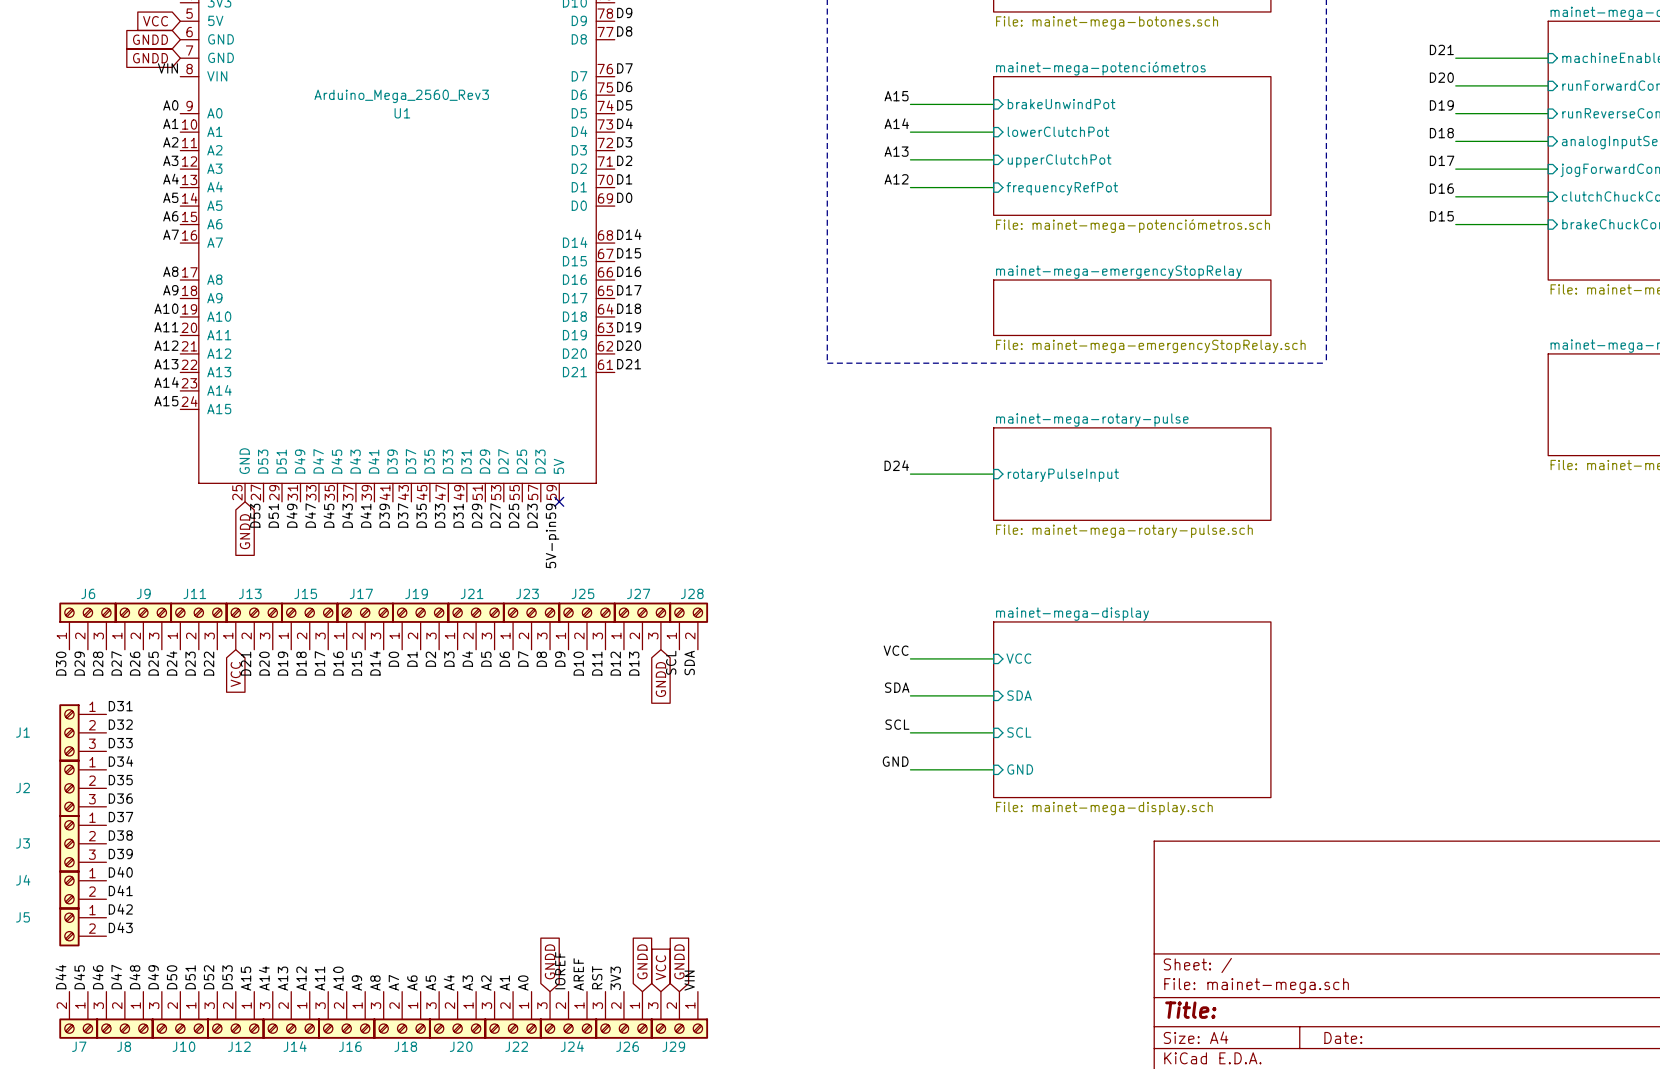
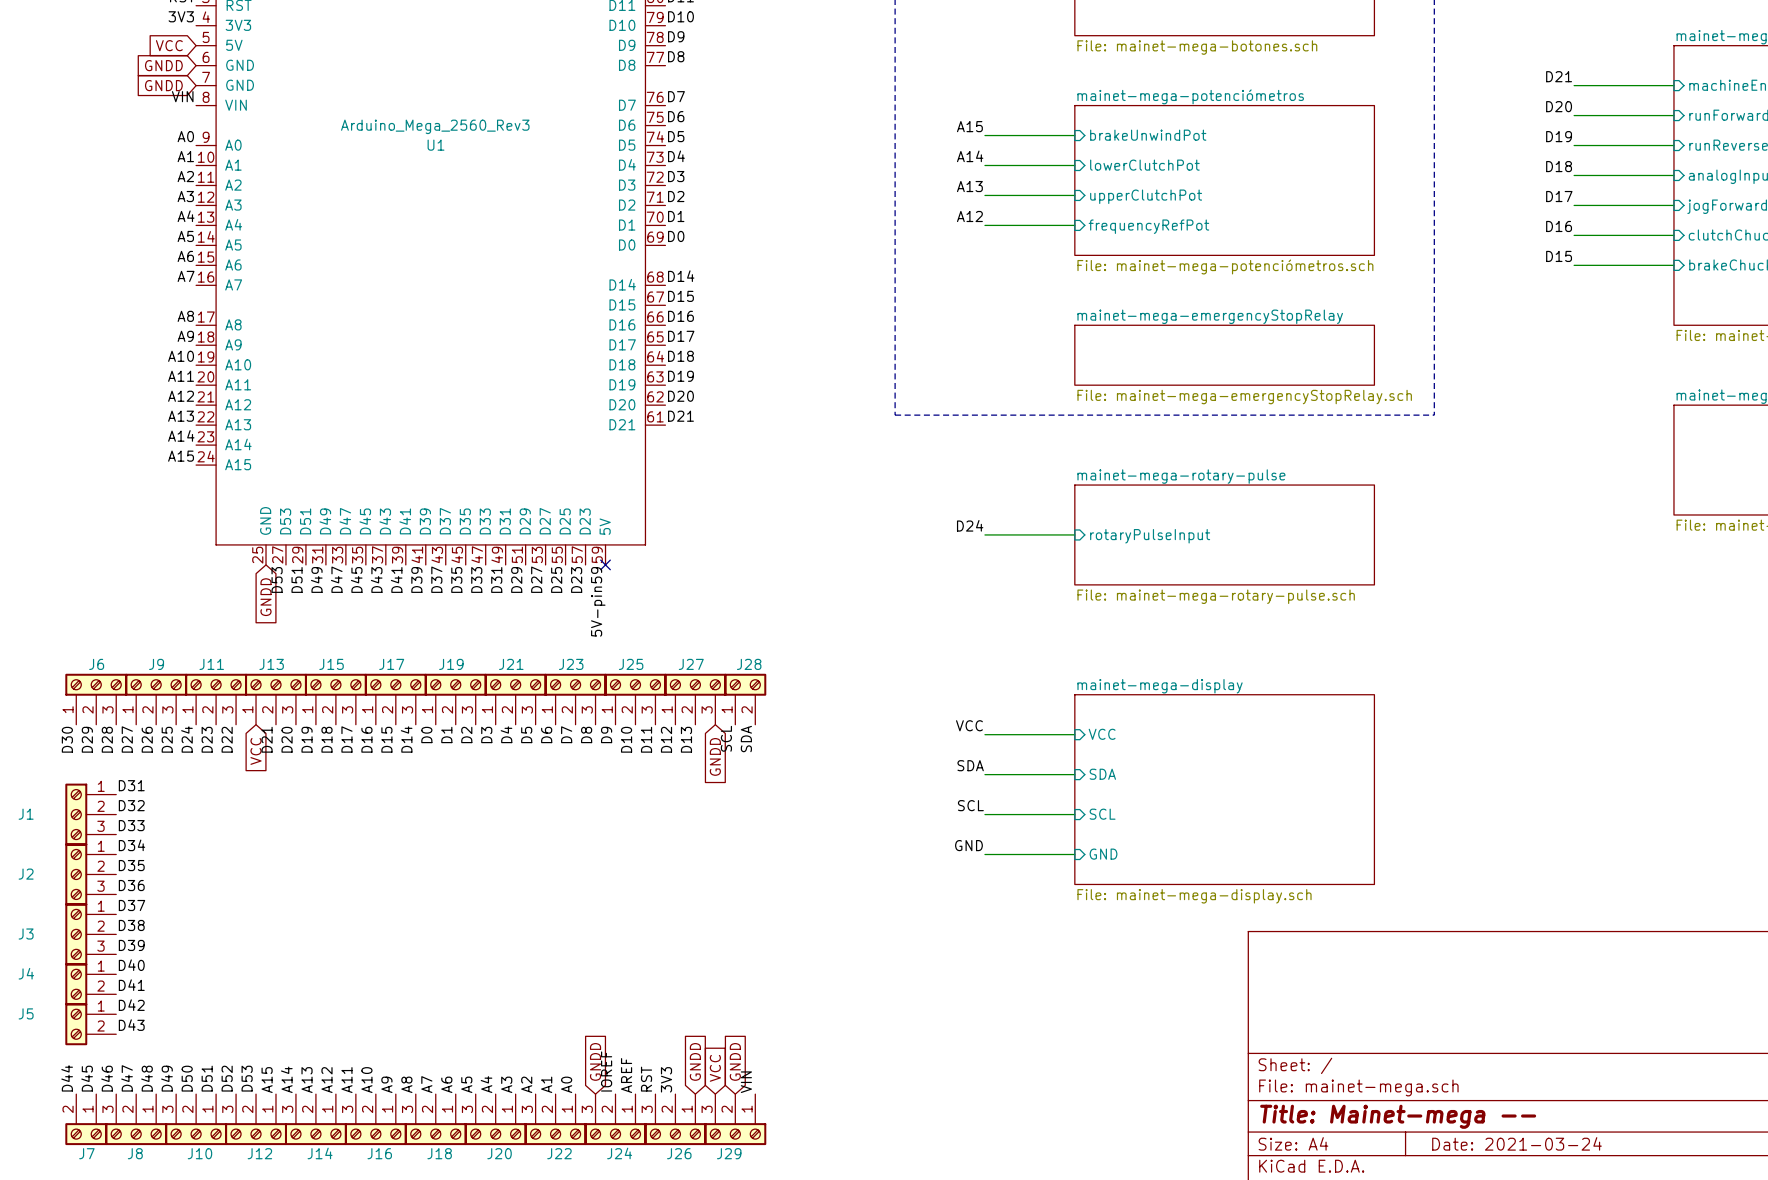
title block: Title: (1190, 1010) -> Title: Mainet-mega -- (1398, 1116)
title block: Date: (1343, 1037) -> Date: 2021-03-24 (1516, 1143)

